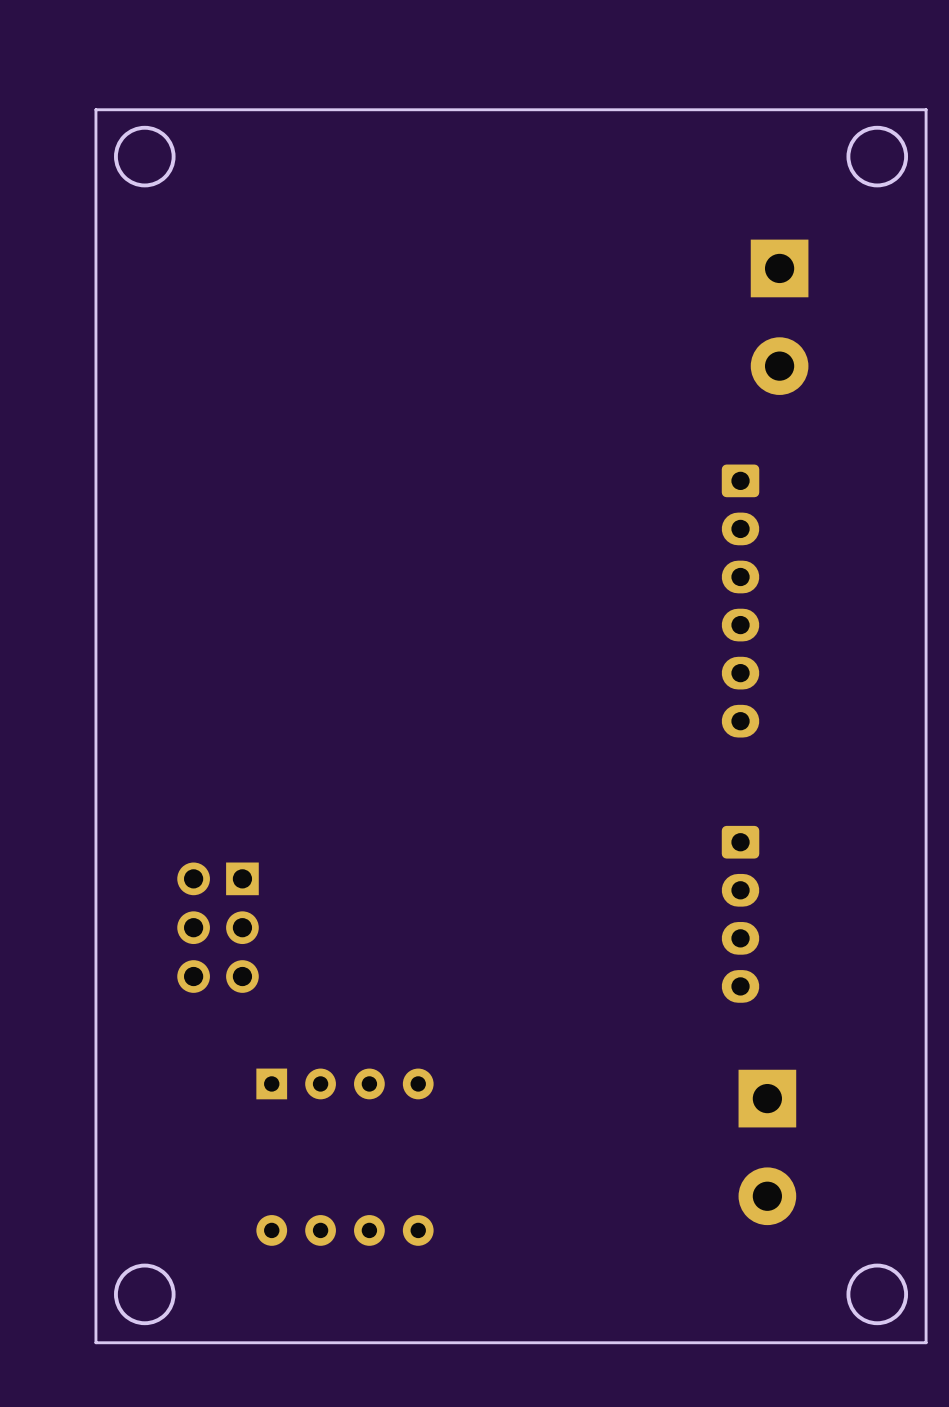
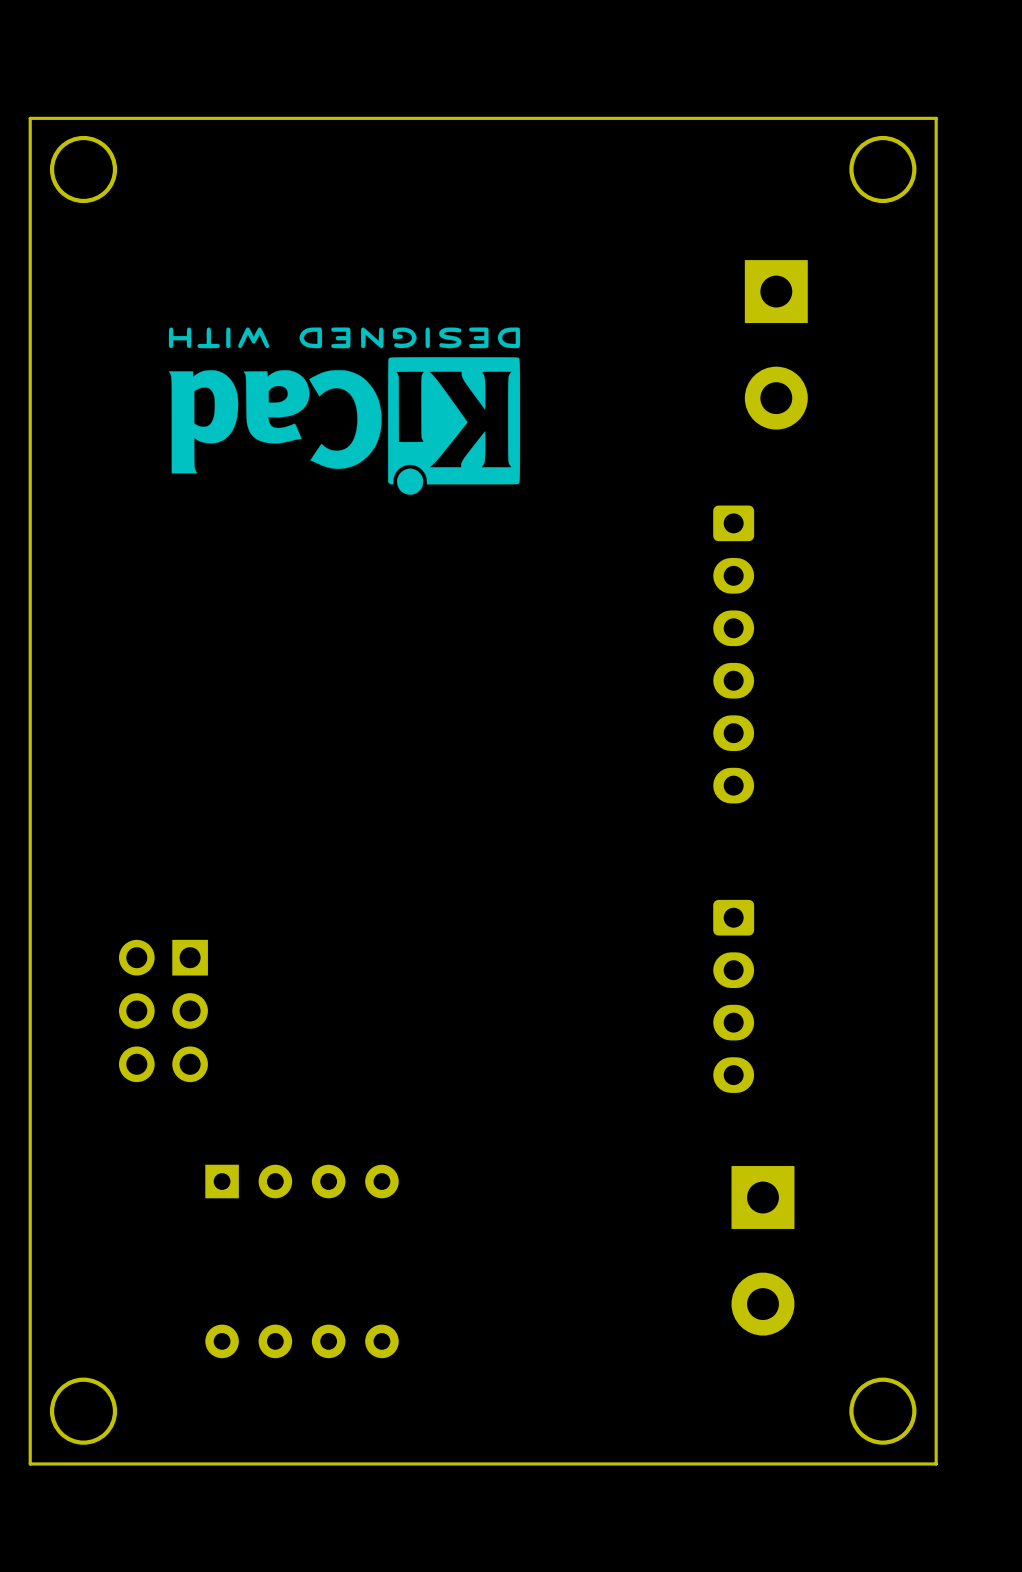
drawing: none -> [168, 327, 521, 495]

